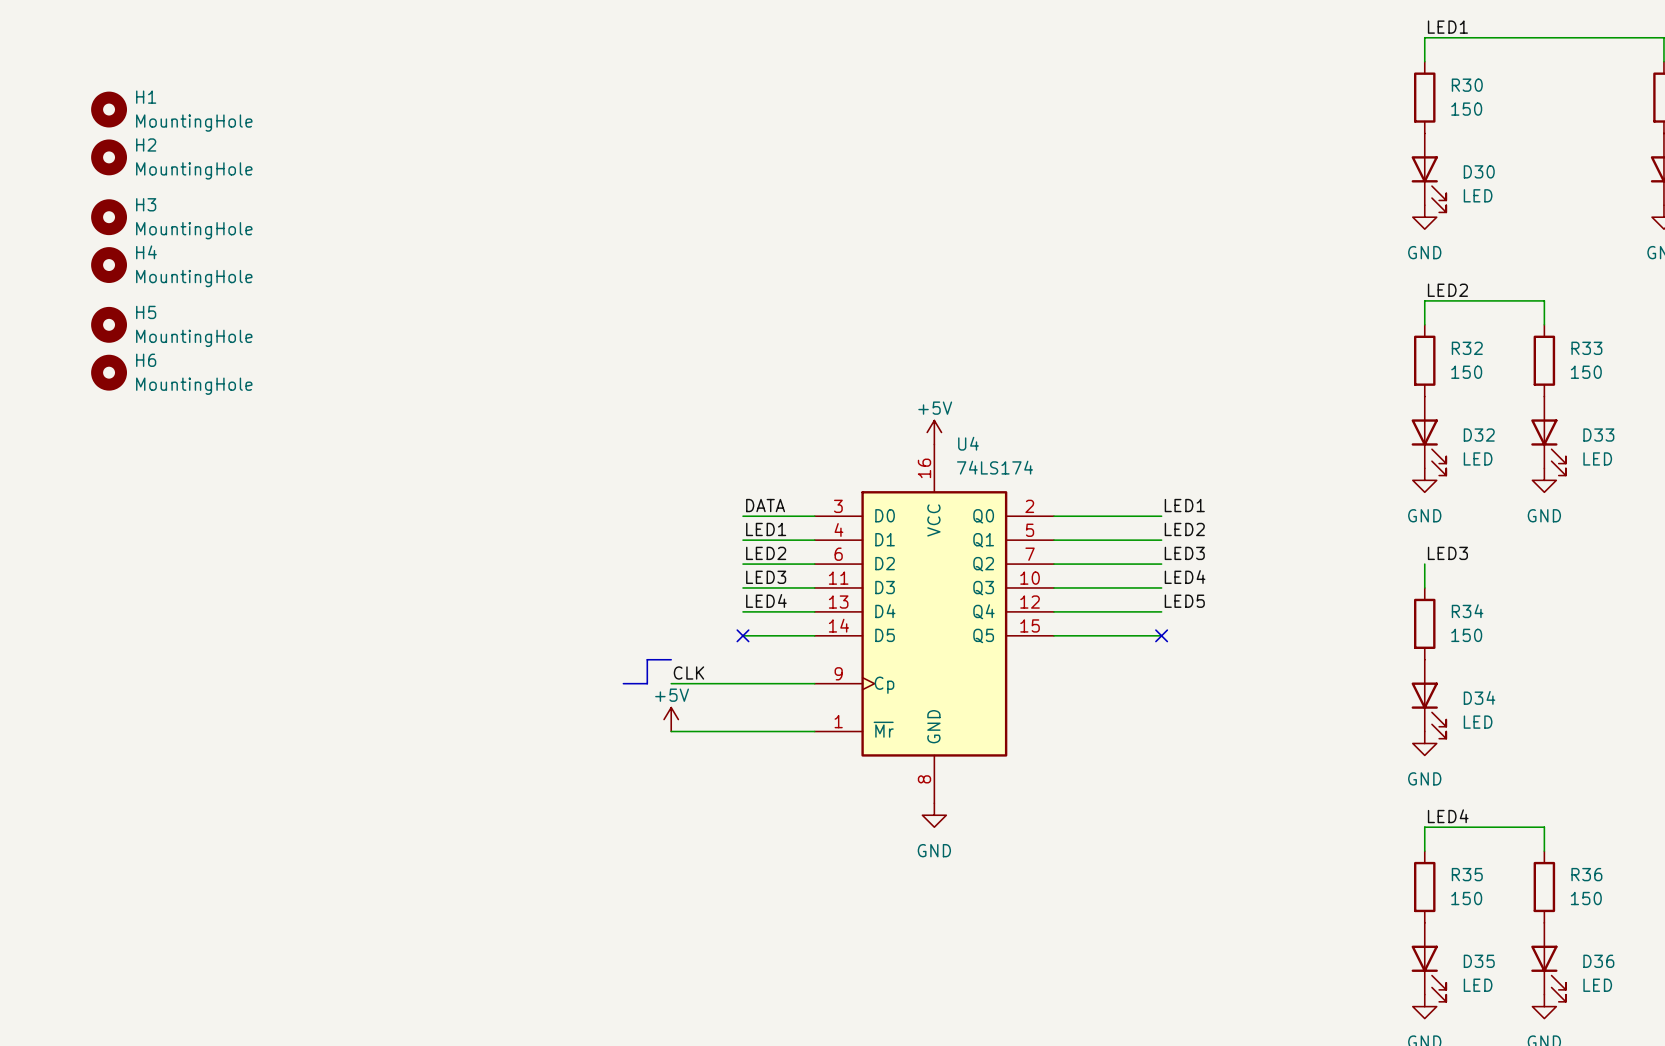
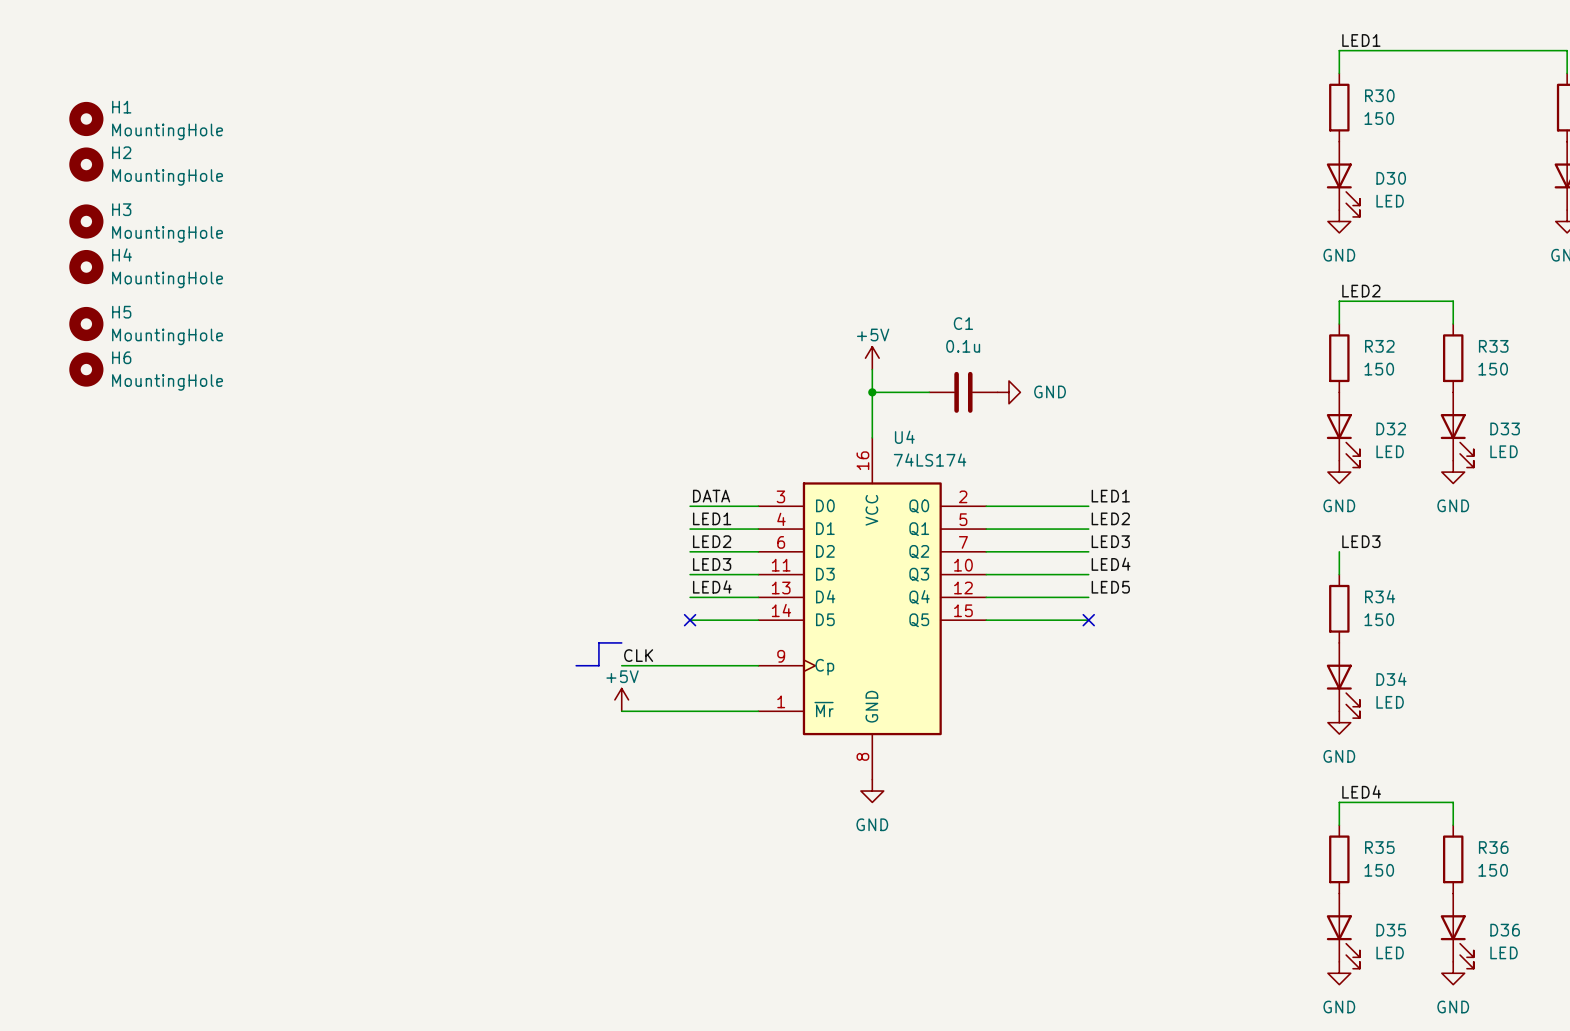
wire: none -> (872, 369) (872, 437)
wire: none -> (872, 392) (929, 392)
junction: none -> (872, 392)
C1: none -> 0.1u (963, 392)
power symbol: none -> GND (1009, 392)
power symbol position: +5V (934, 432) -> +5V (872, 358)

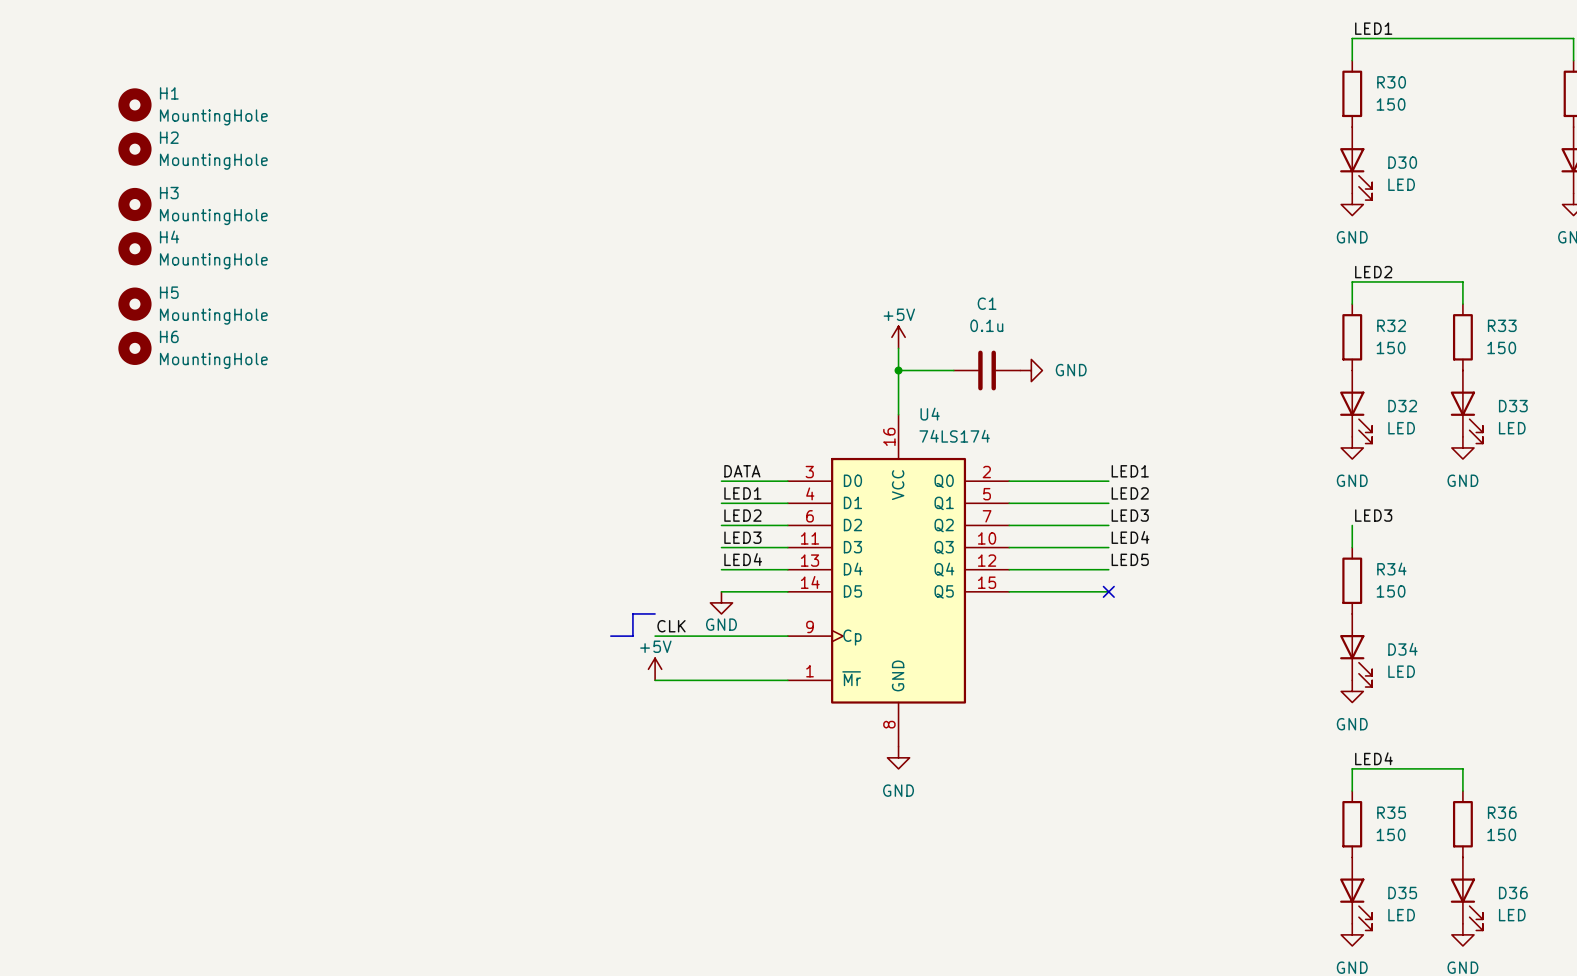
no-connect mark: (690, 620) -> none
power symbol: none -> GND (721, 602)

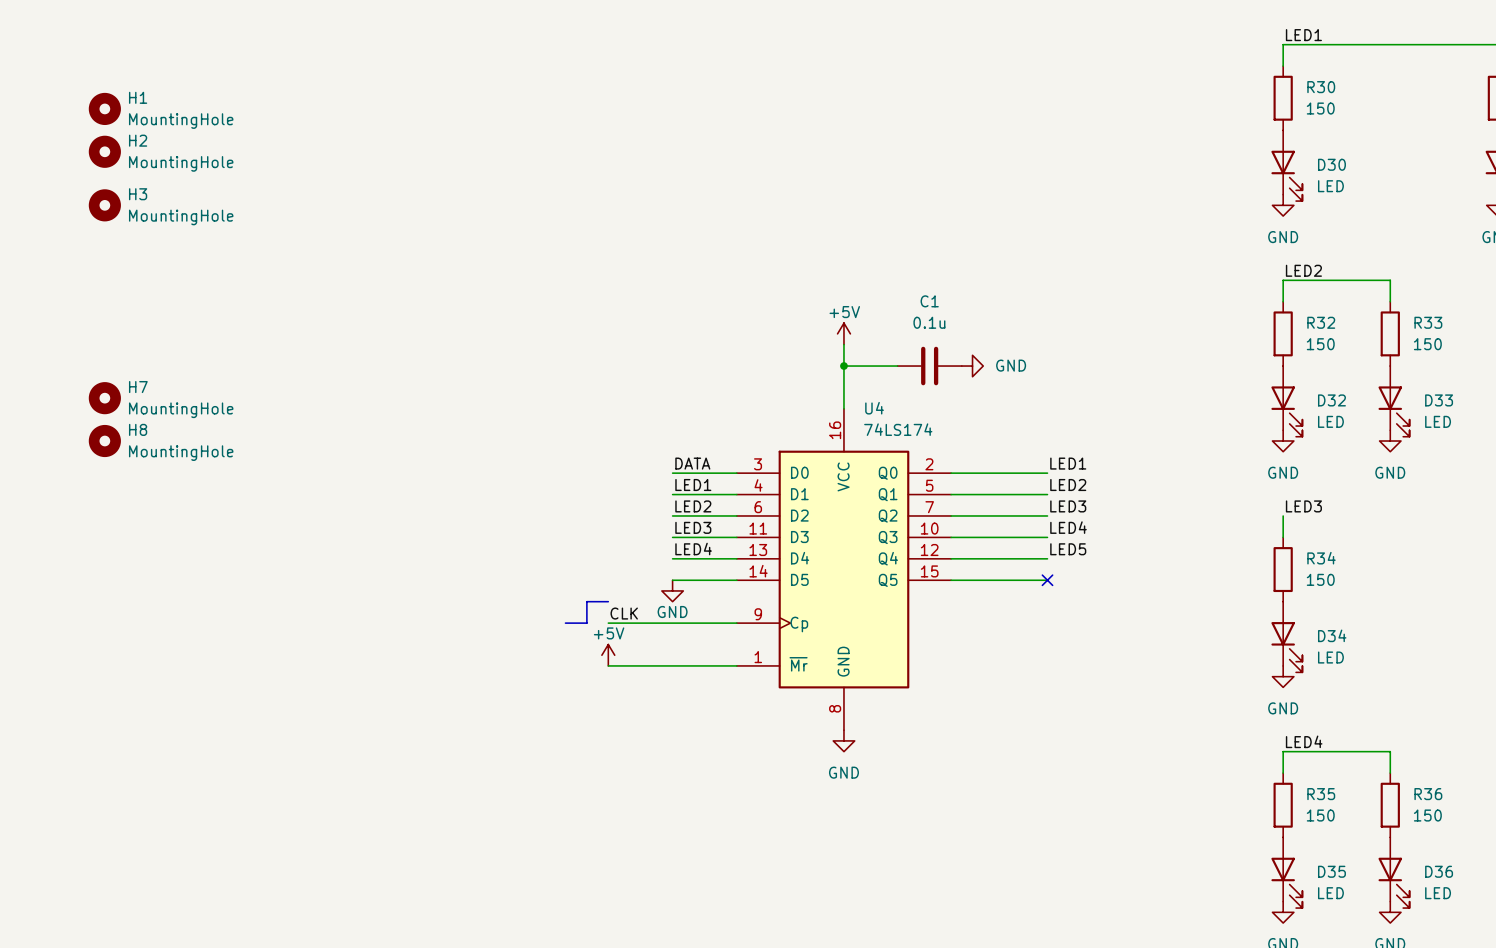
H4: MountingHole (134, 248) -> none
H5: MountingHole (134, 304) -> none
H6: MountingHole (134, 348) -> none
H7: none -> MountingHole (104, 398)
H8: none -> MountingHole (104, 441)

